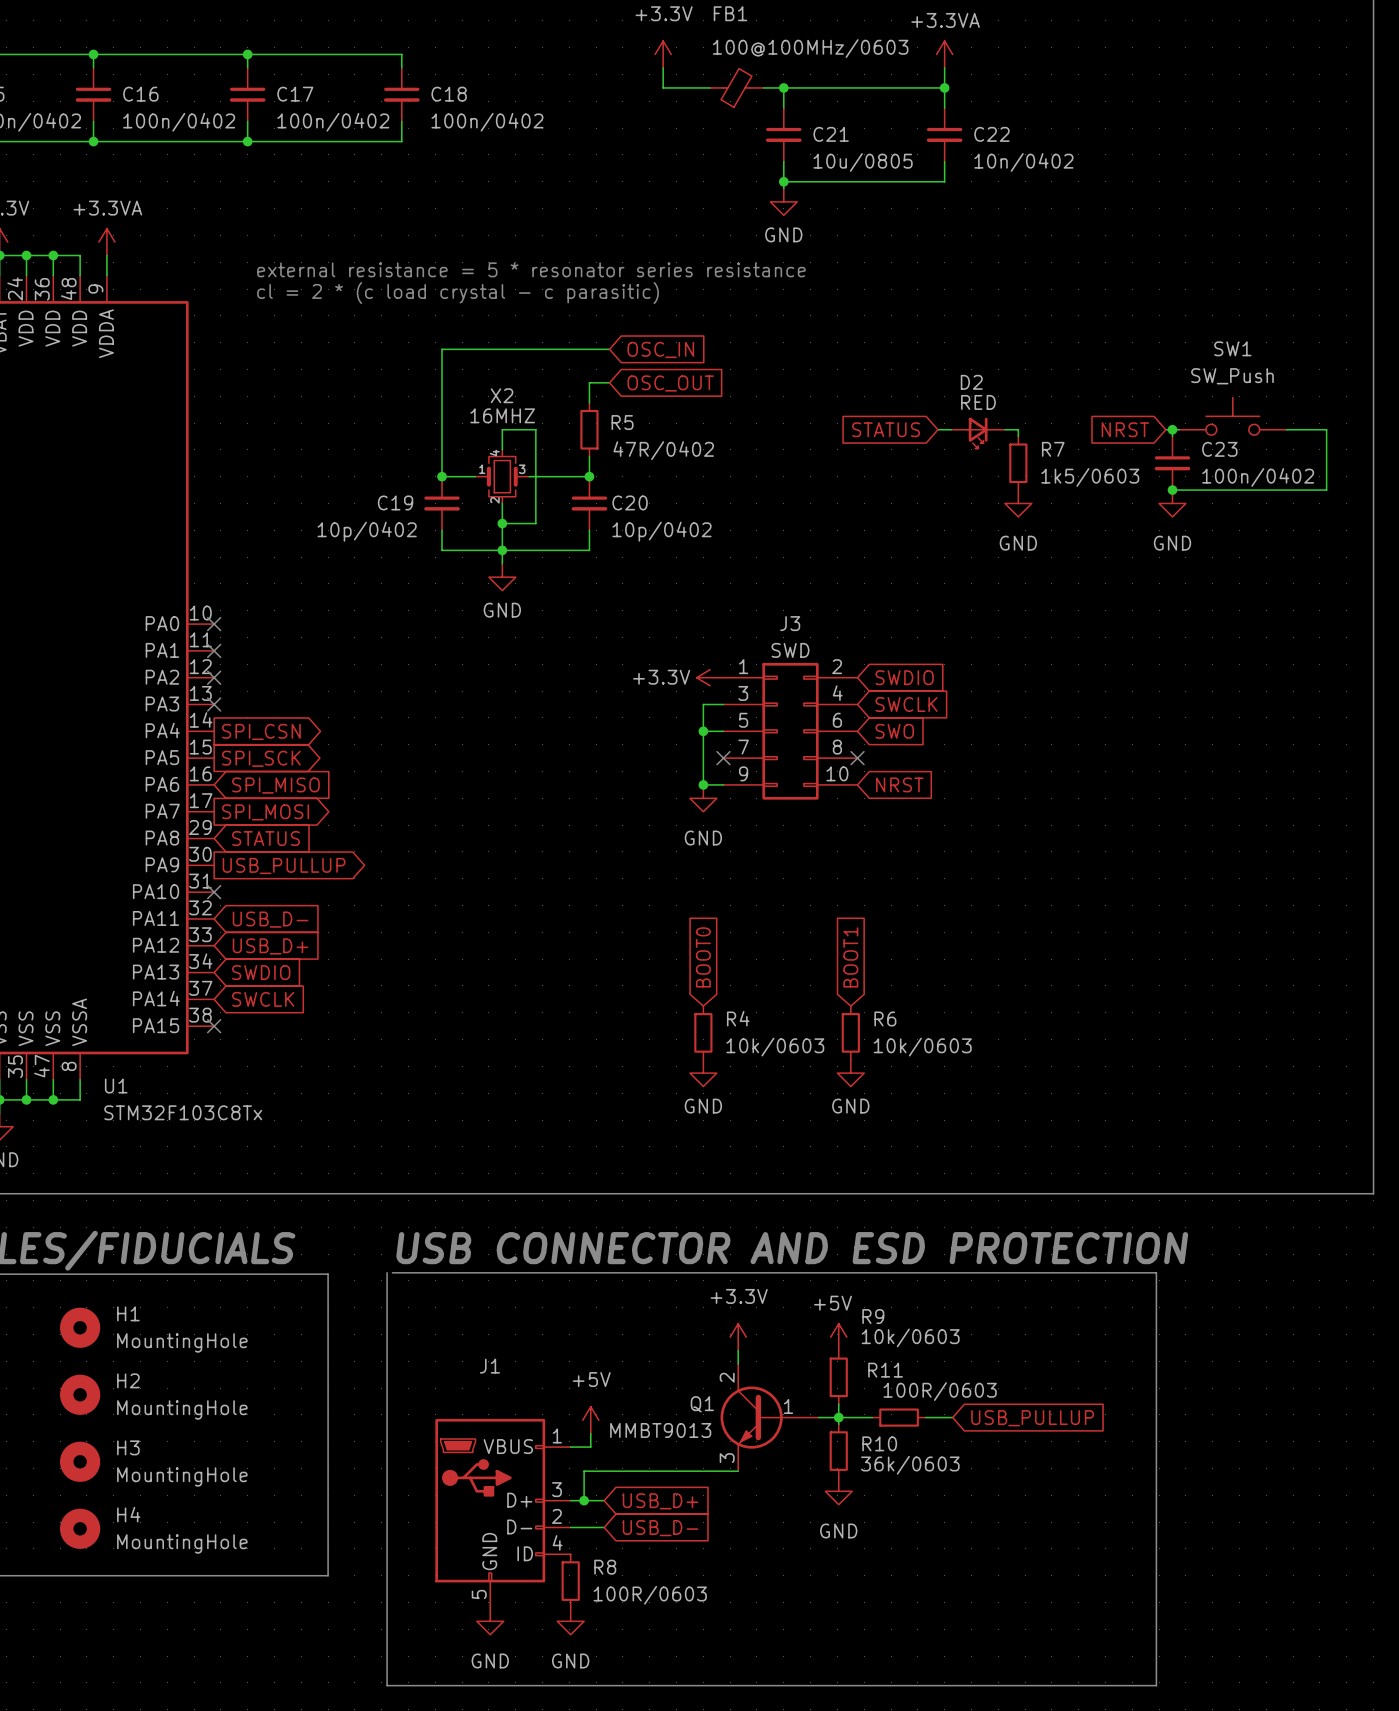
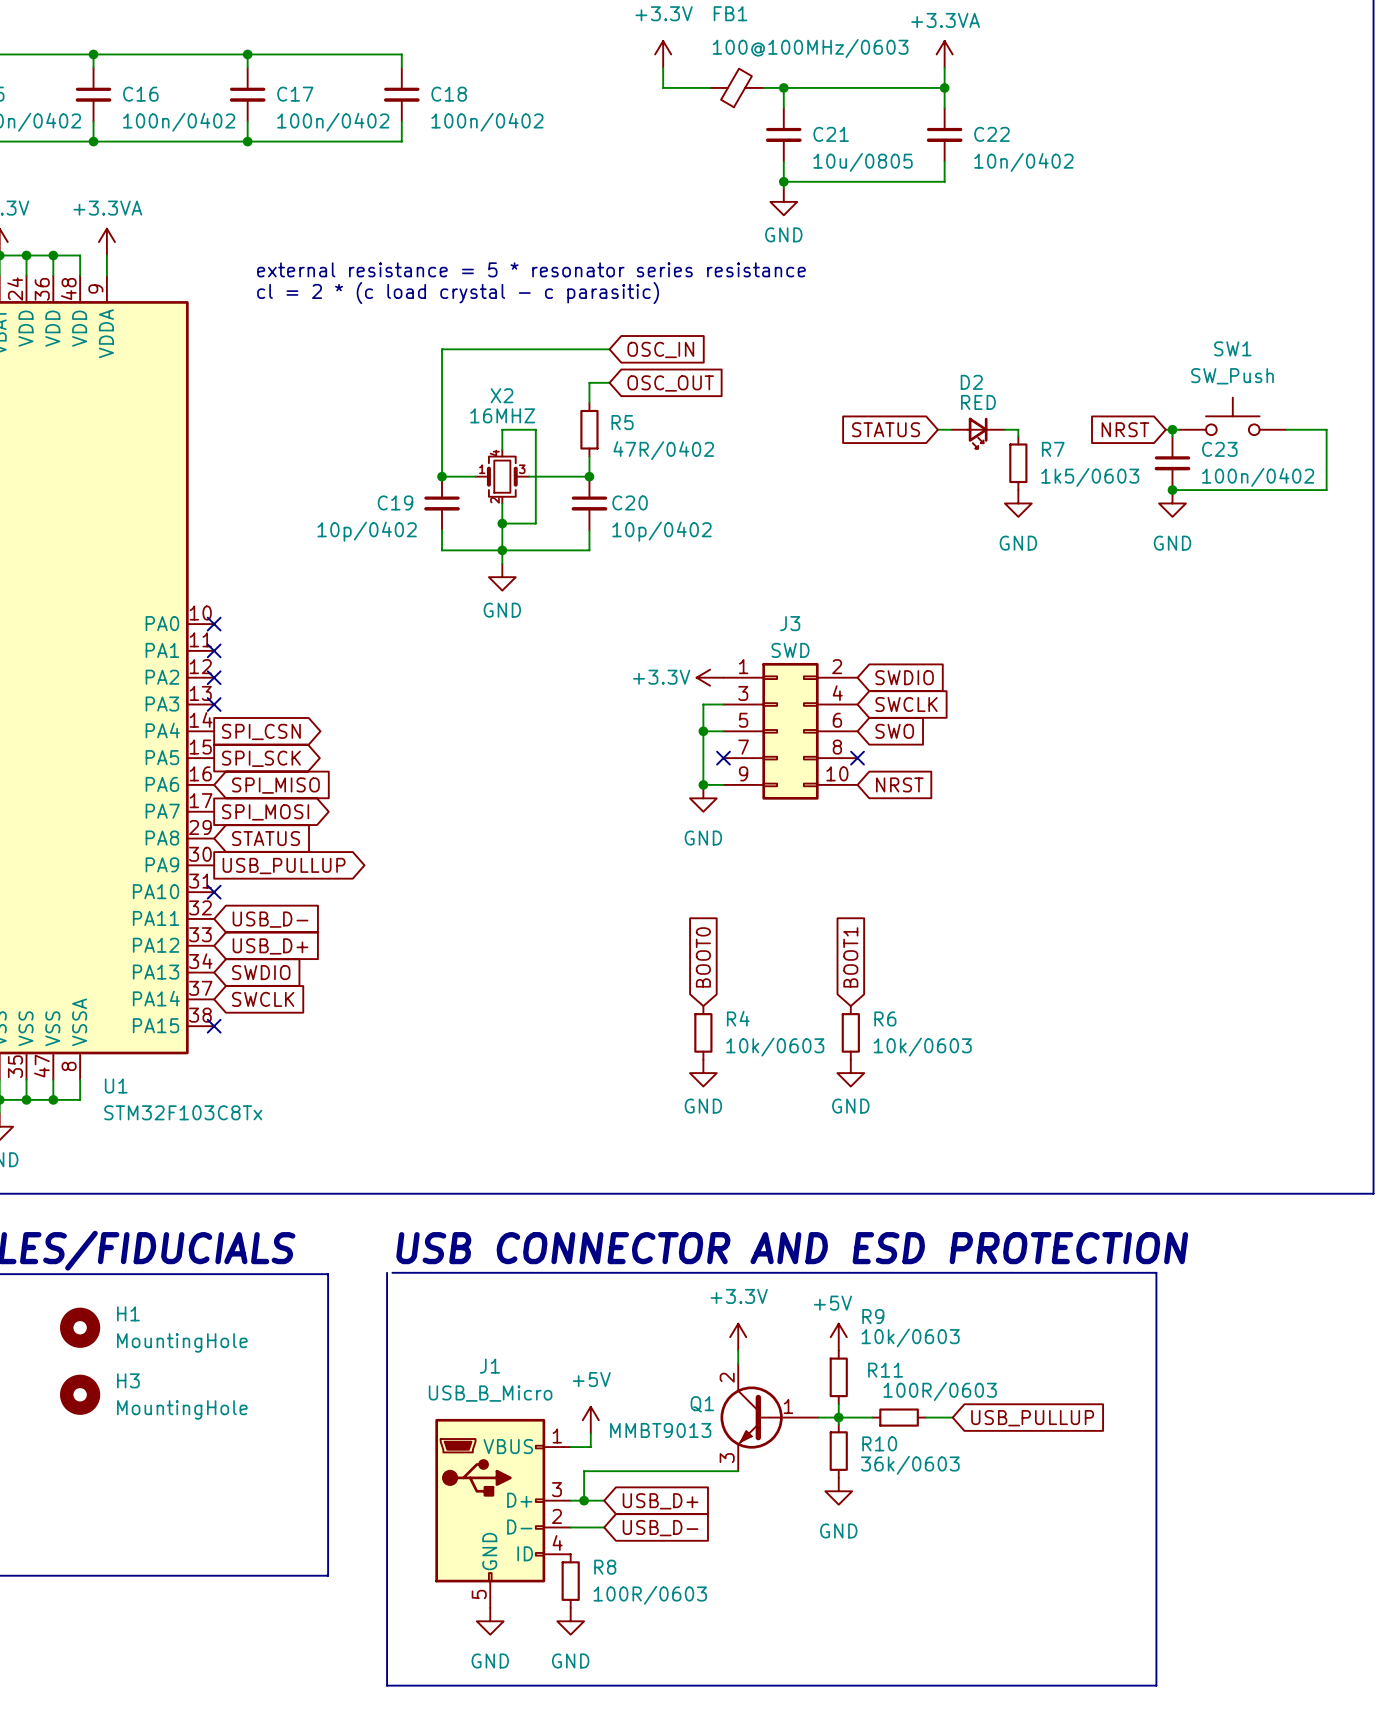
H2 name: H2 (128, 1380) -> H3 (128, 1380)
J1 value: none -> USB_B_Micro (490, 1393)
H3: MountingHole (80, 1461) -> none
H4: MountingHole (80, 1528) -> none

